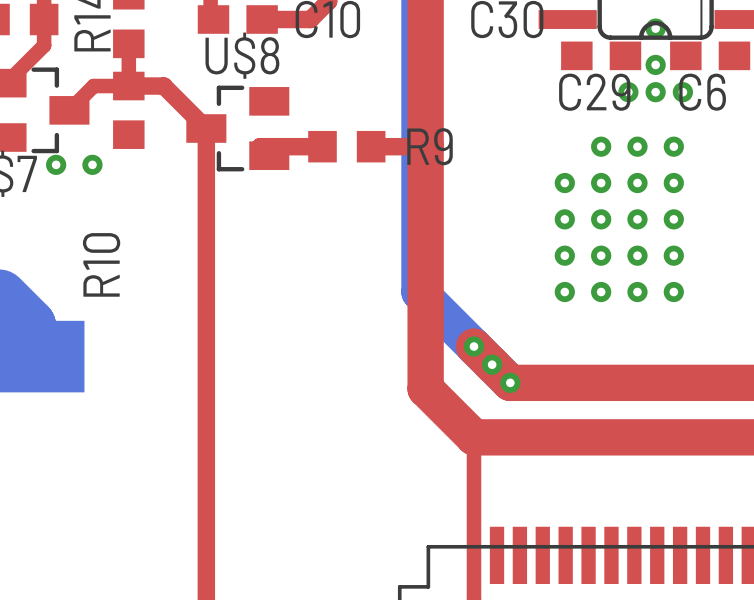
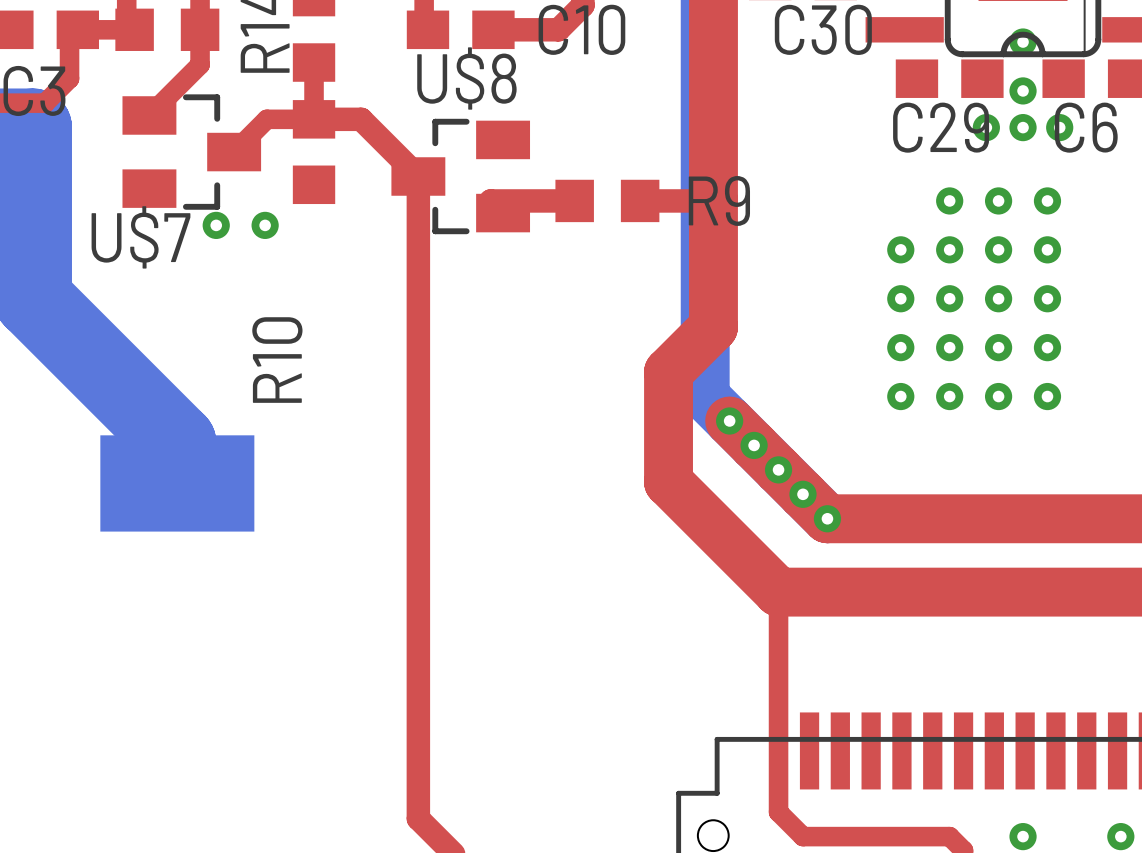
top track: (425, 240) (425, 389) -> (713, 327) (668, 372) (668, 482) (713, 527)
top track: none -> (729, 420) (778, 469)
via: none -> (729, 420)
via: none -> (754, 445)

